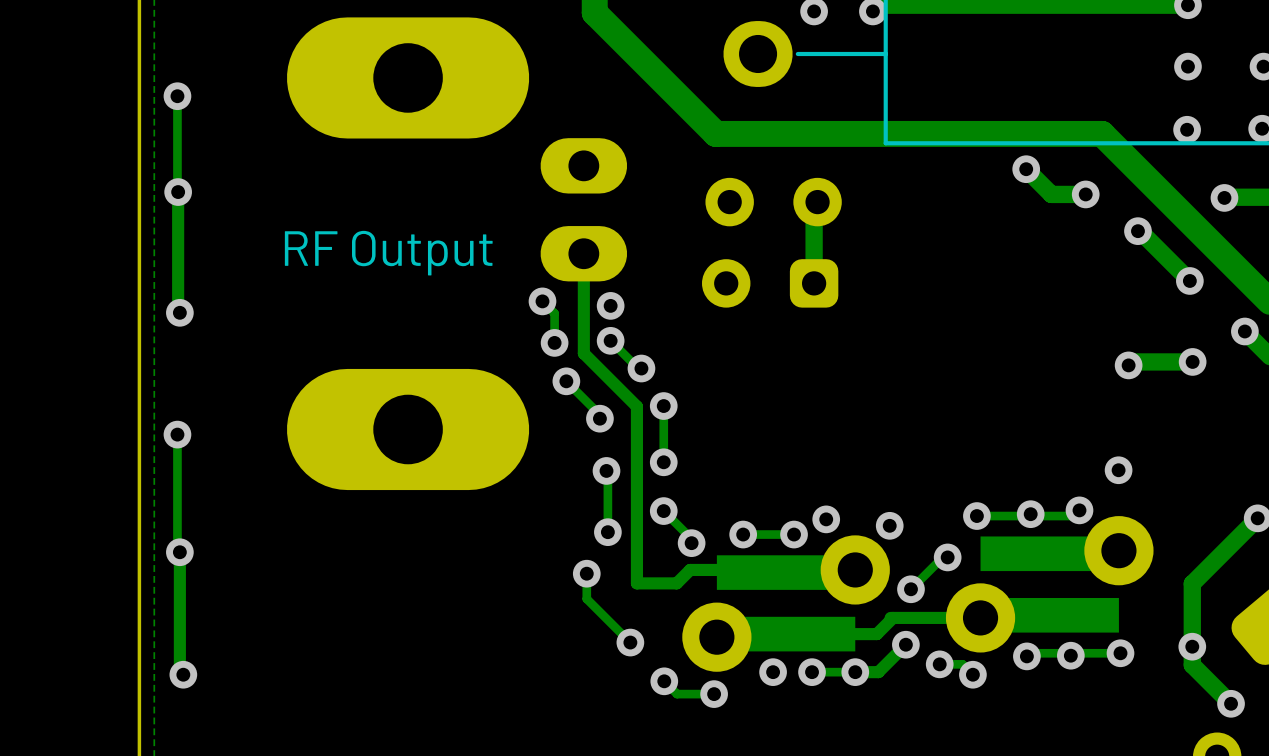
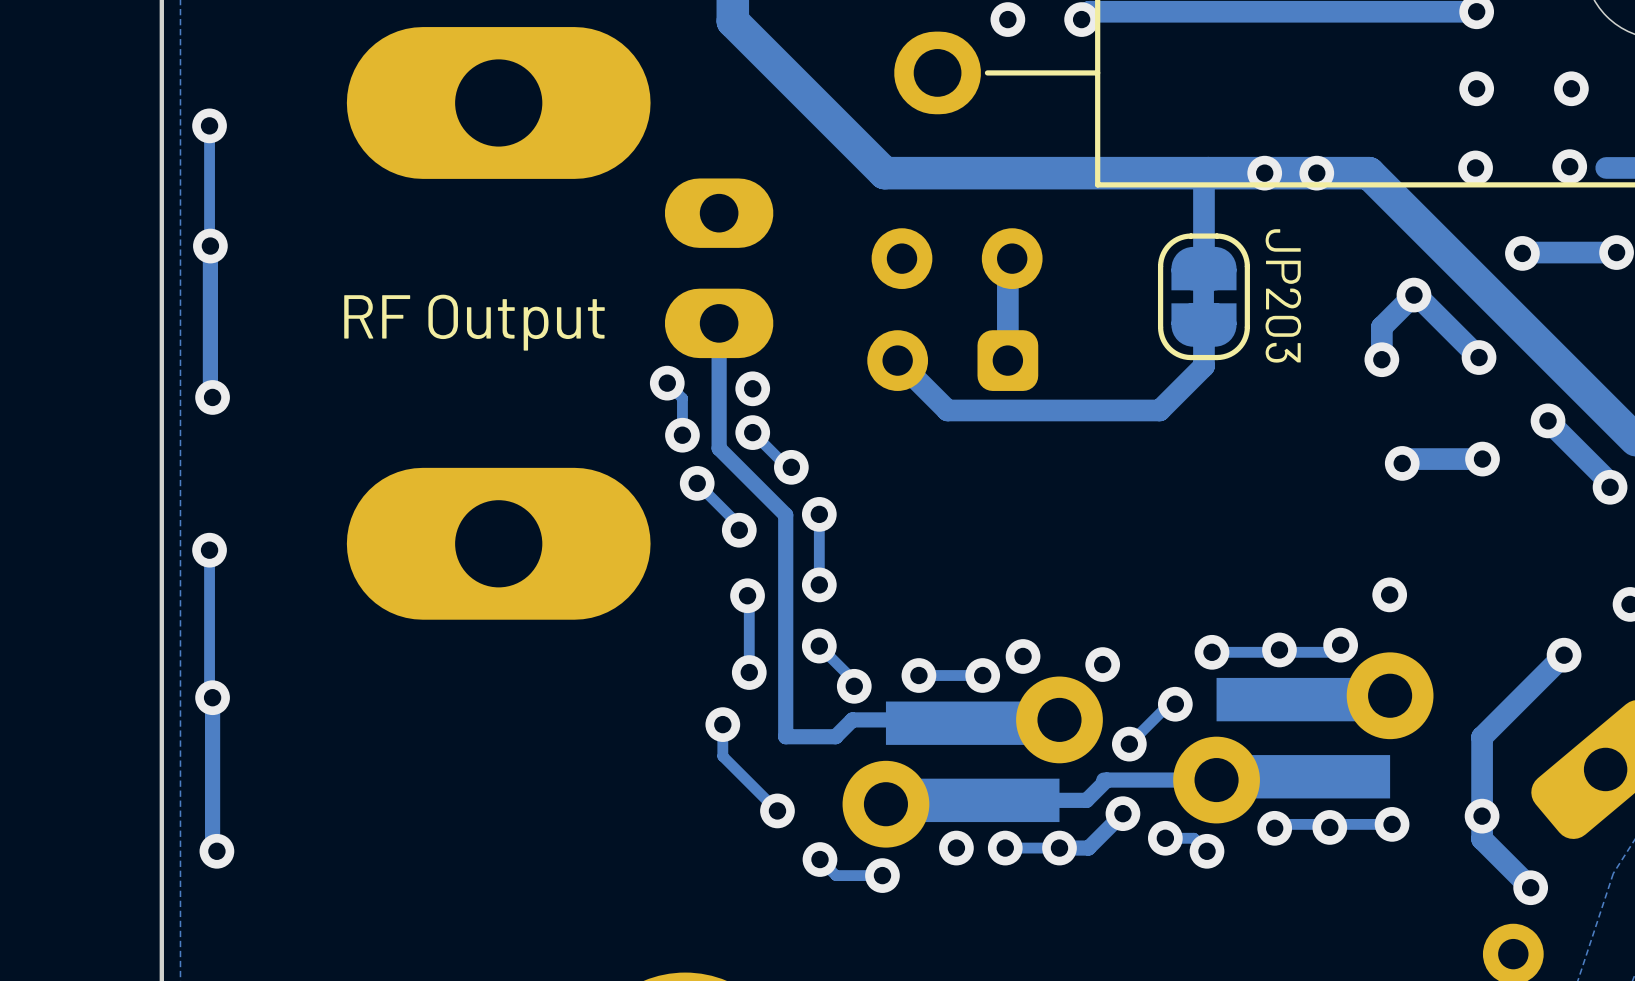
track: none -> (1208, 173) (1203, 177) (1203, 268)
via: none -> (1264, 173)
via: none -> (1316, 173)
track: (1026, 169) (1051, 194) (1085, 194) -> none
via: (1026, 169) -> none
via: (1085, 194) -> none
track: none -> (1413, 295) (1381, 327) (1381, 359)
JP203: none -> (1203, 296)
track: none -> (1203, 325) (1203, 366) (1159, 410) (947, 410) (897, 360)
via: none -> (1381, 359)

